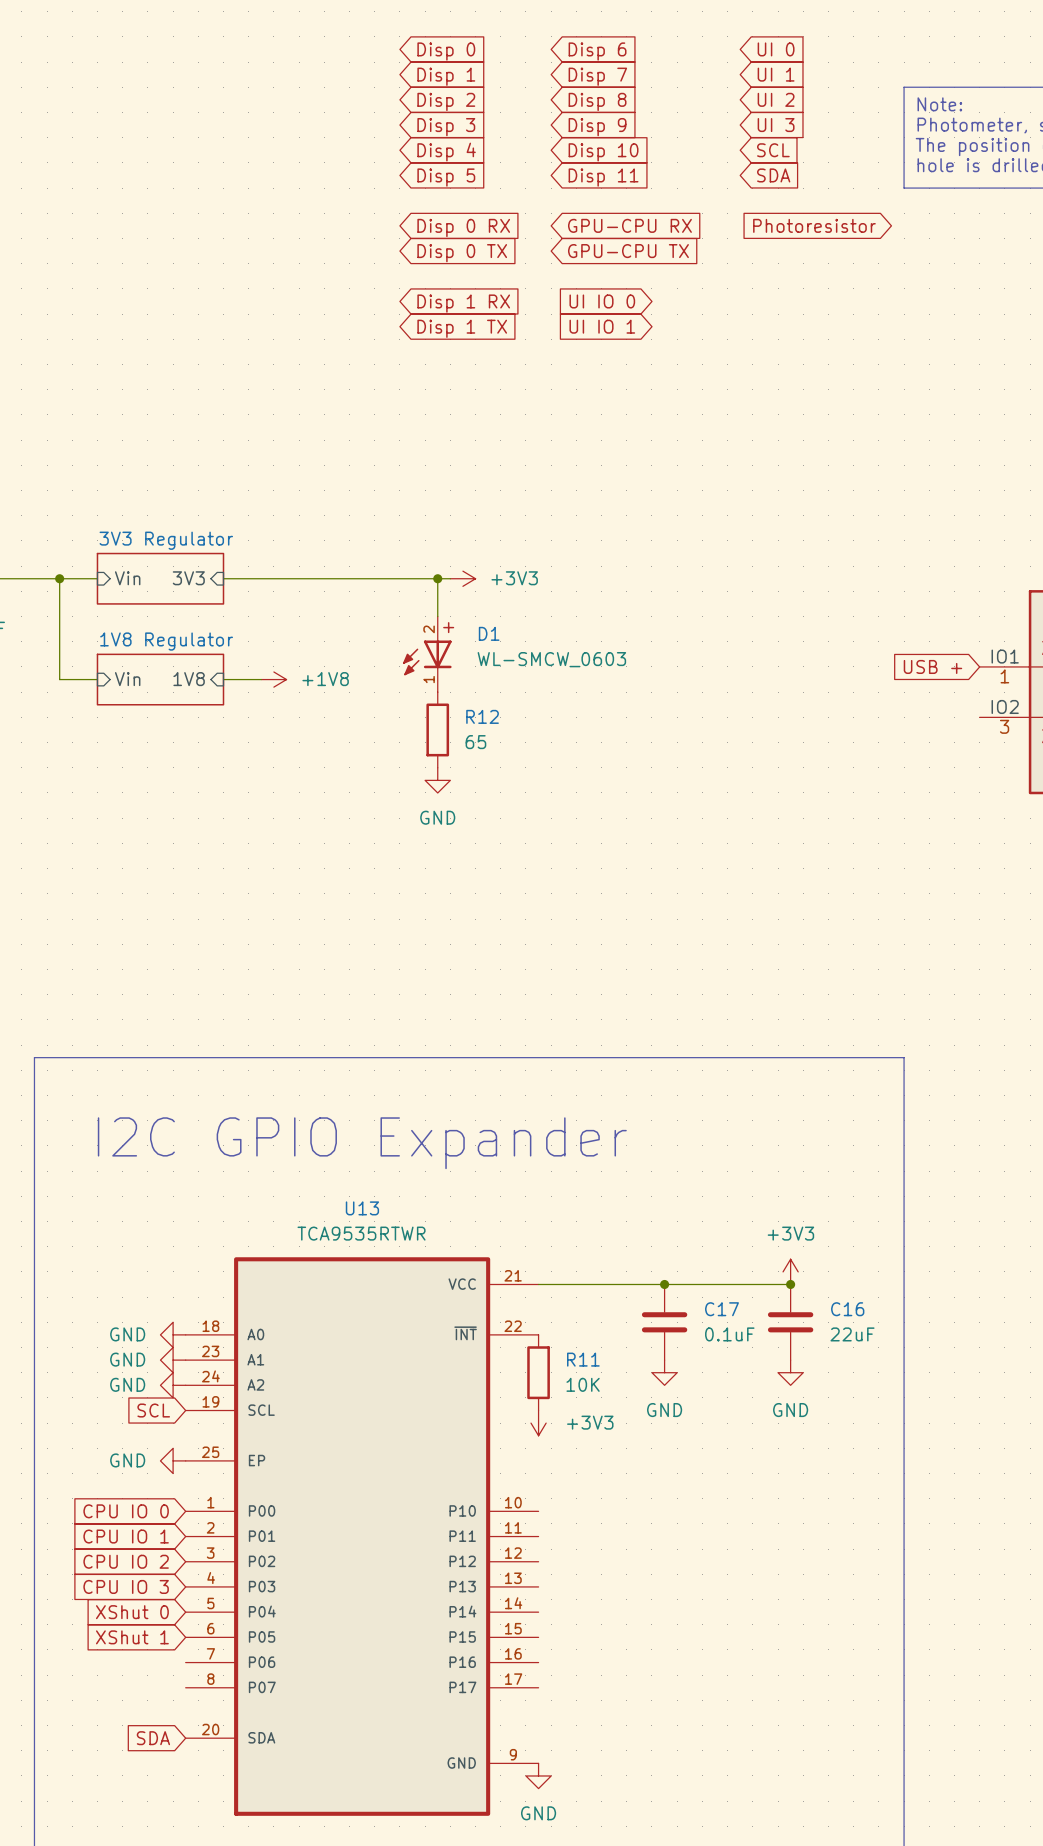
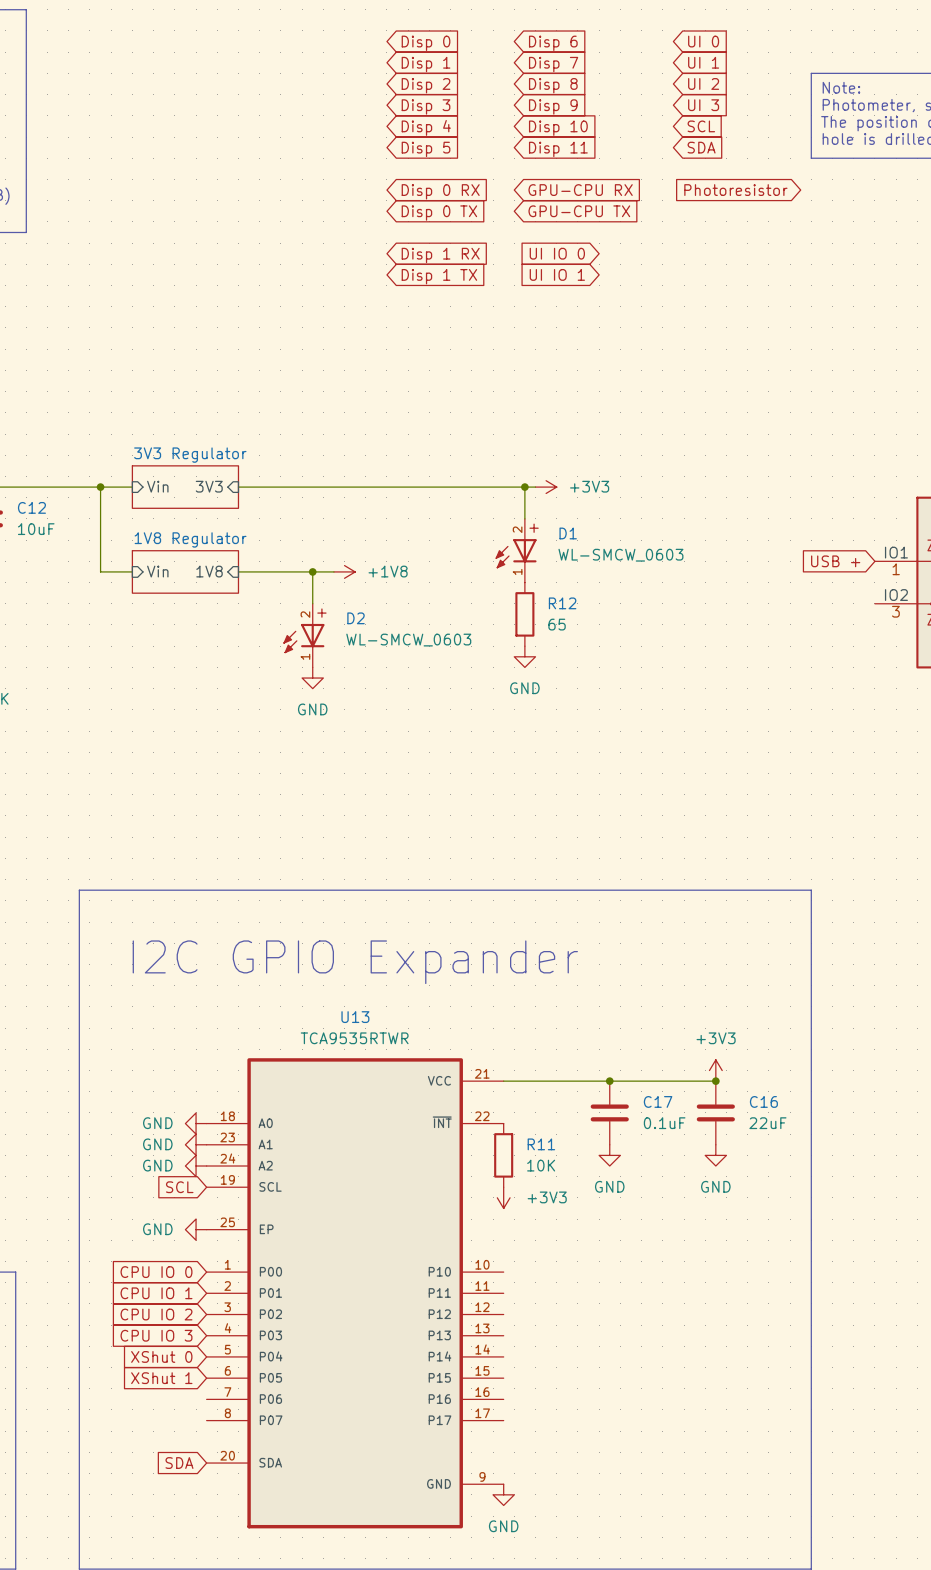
wire: (437, 578) (437, 616) -> (524, 487) (524, 518)
junction: (437, 578) -> none
wire: none -> (429, 487) (535, 487)
power symbol position: +3V3 (462, 578) -> +3V3 (546, 487)
junction: none -> (524, 487)
D1 position: (427, 654) -> (516, 550)
wire: none -> (270, 571) (333, 571)
power symbol position: +1V8 (273, 679) -> +1V8 (344, 571)
wire: none -> (312, 571) (312, 603)
junction: none -> (312, 571)
R12 position: (437, 729) -> (524, 614)
D2: none -> WL-SMCW_0603 (303, 635)
power symbol: GND (437, 780) -> none
power symbol: none -> GND (524, 656)
power symbol: none -> GND (312, 678)

